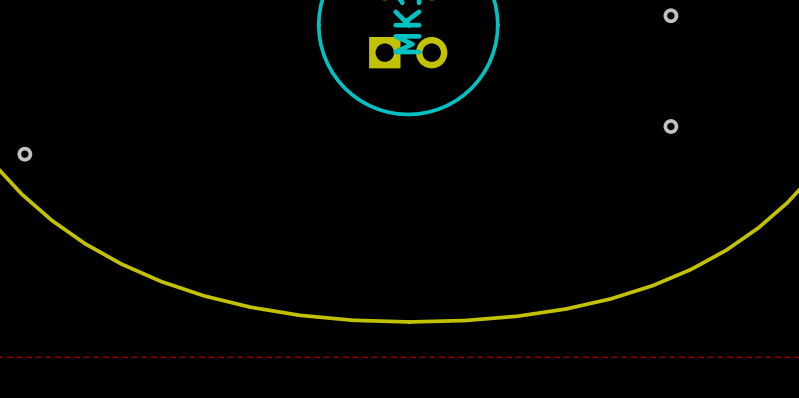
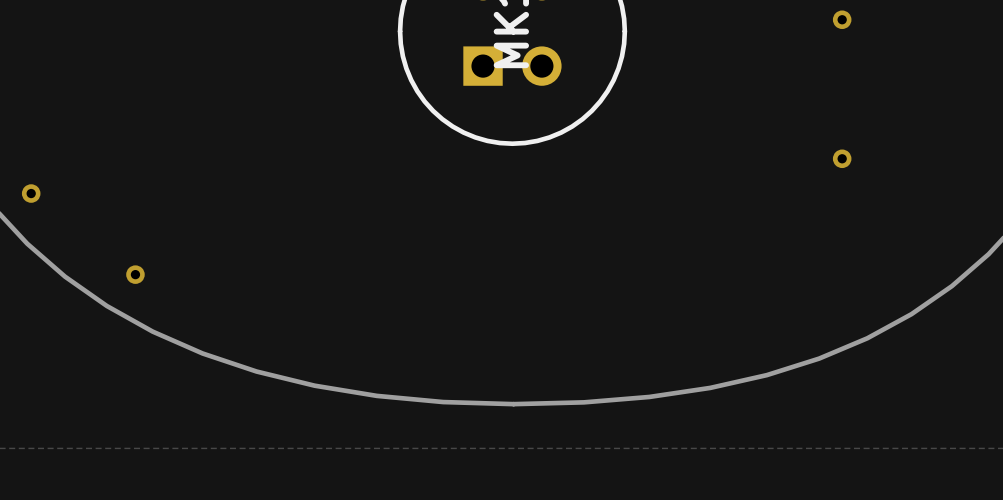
via: none -> (135, 274)

